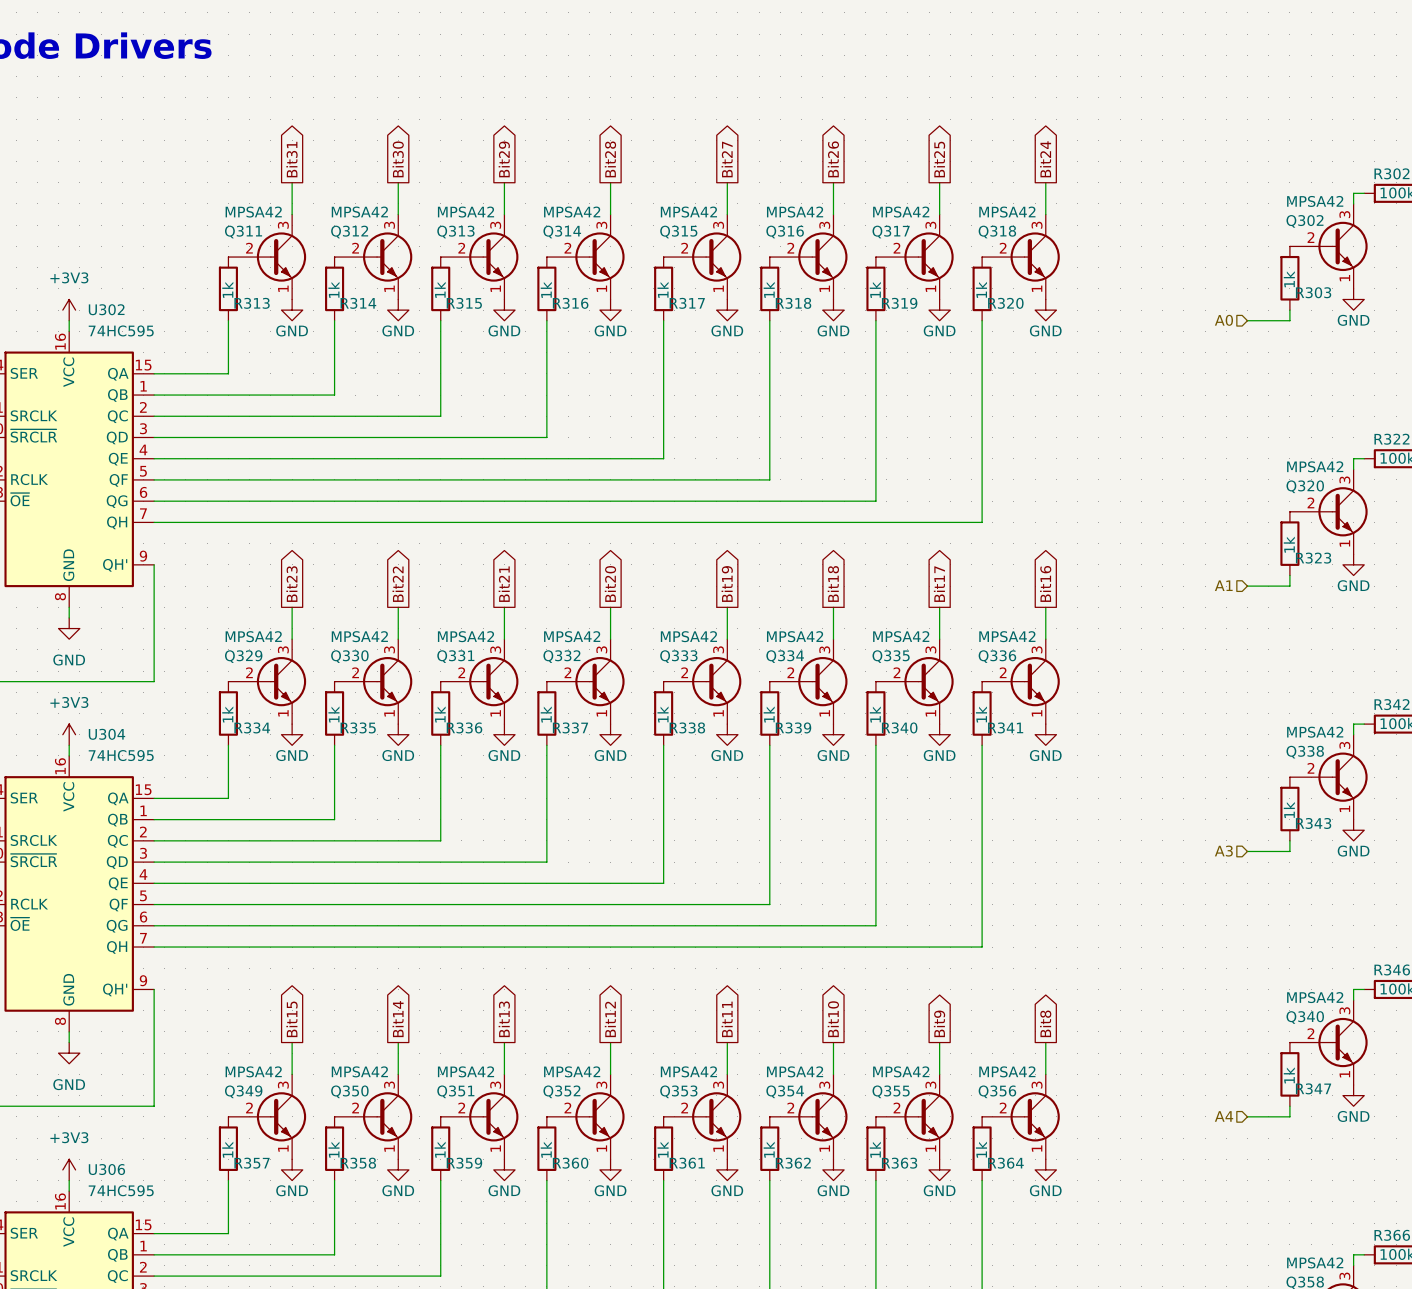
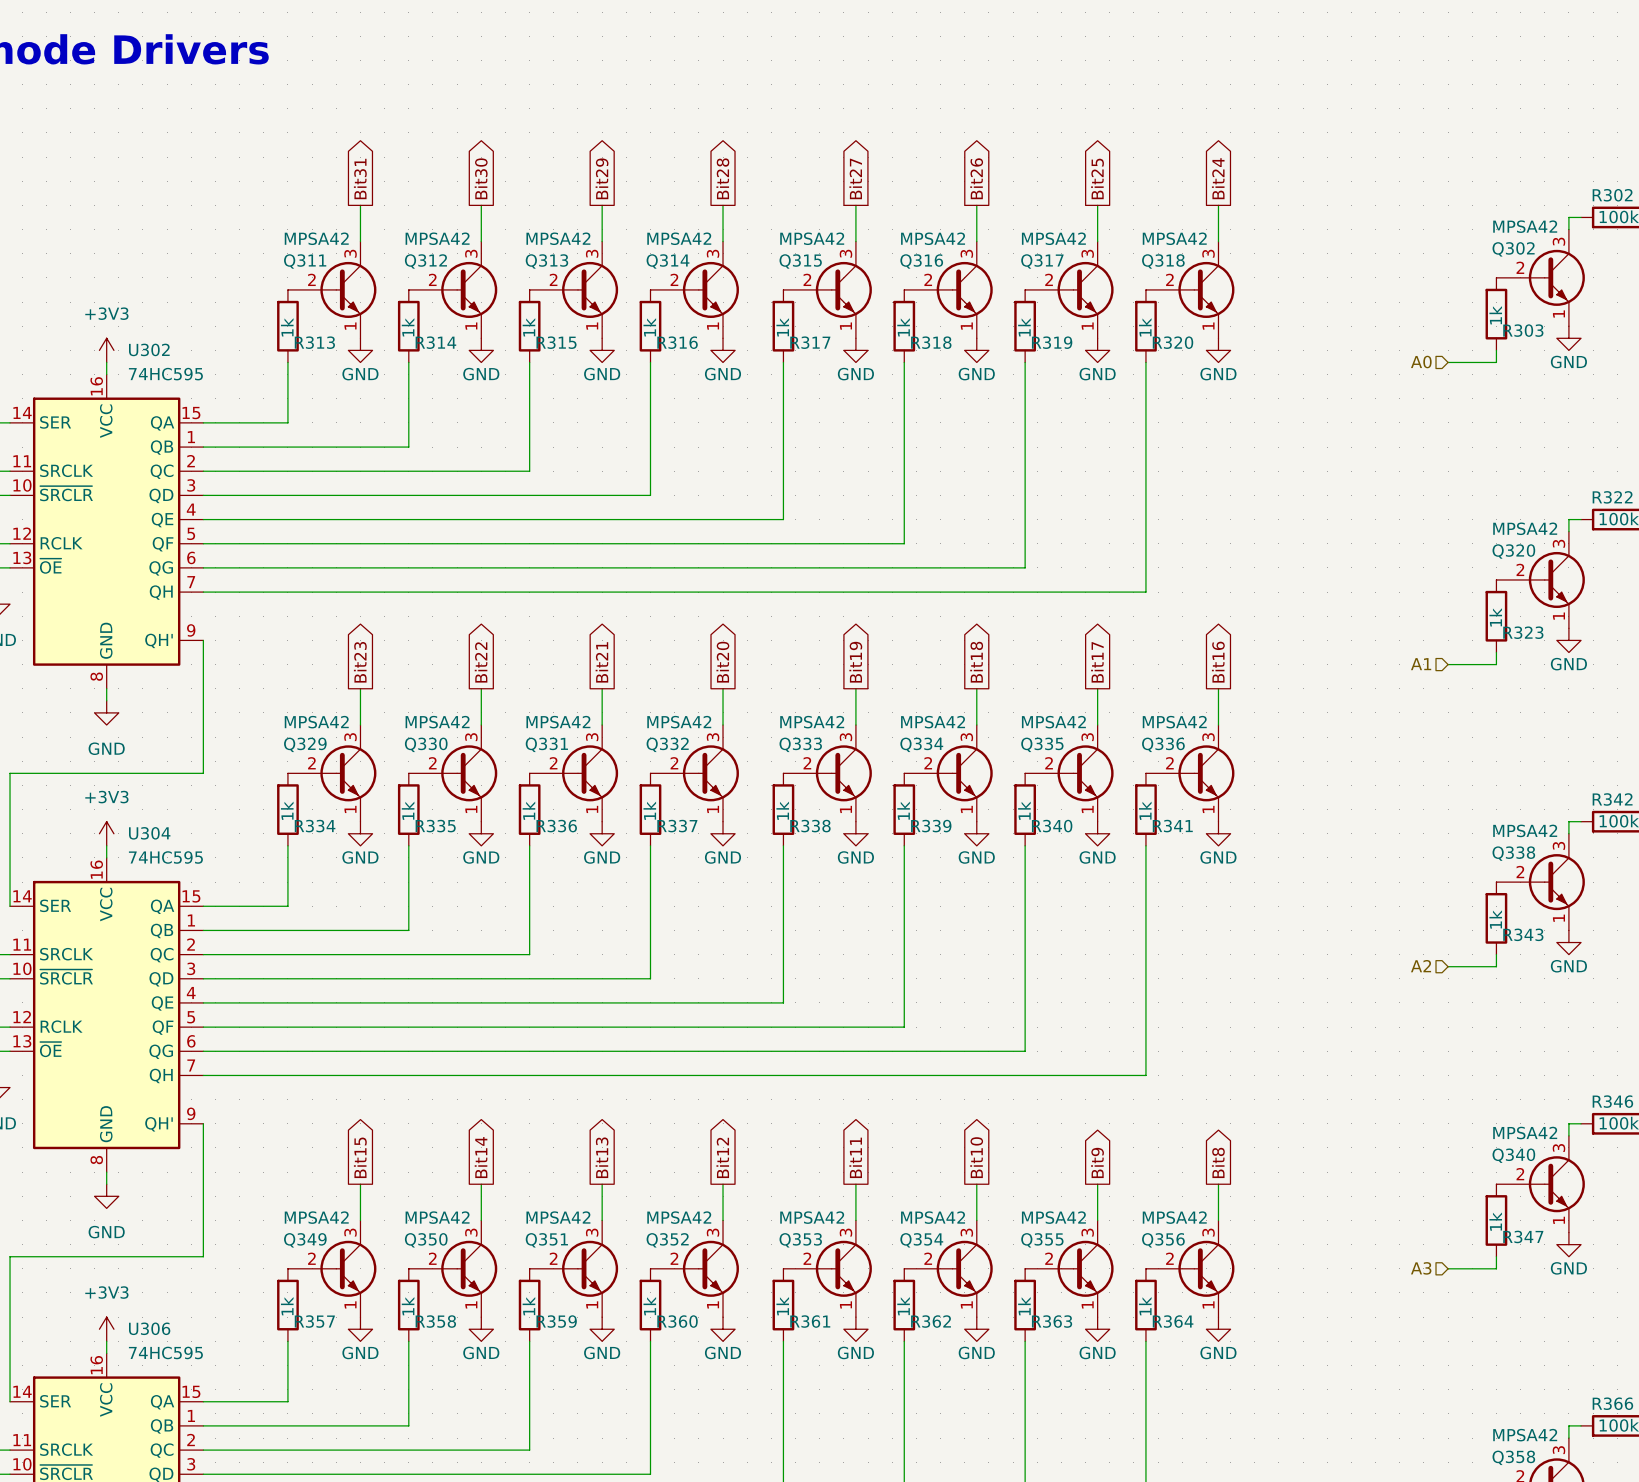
hierarchical label: A3 (1223, 851) -> A2 (1421, 966)
hierarchical label: A4 (1224, 1116) -> A3 (1421, 1268)

